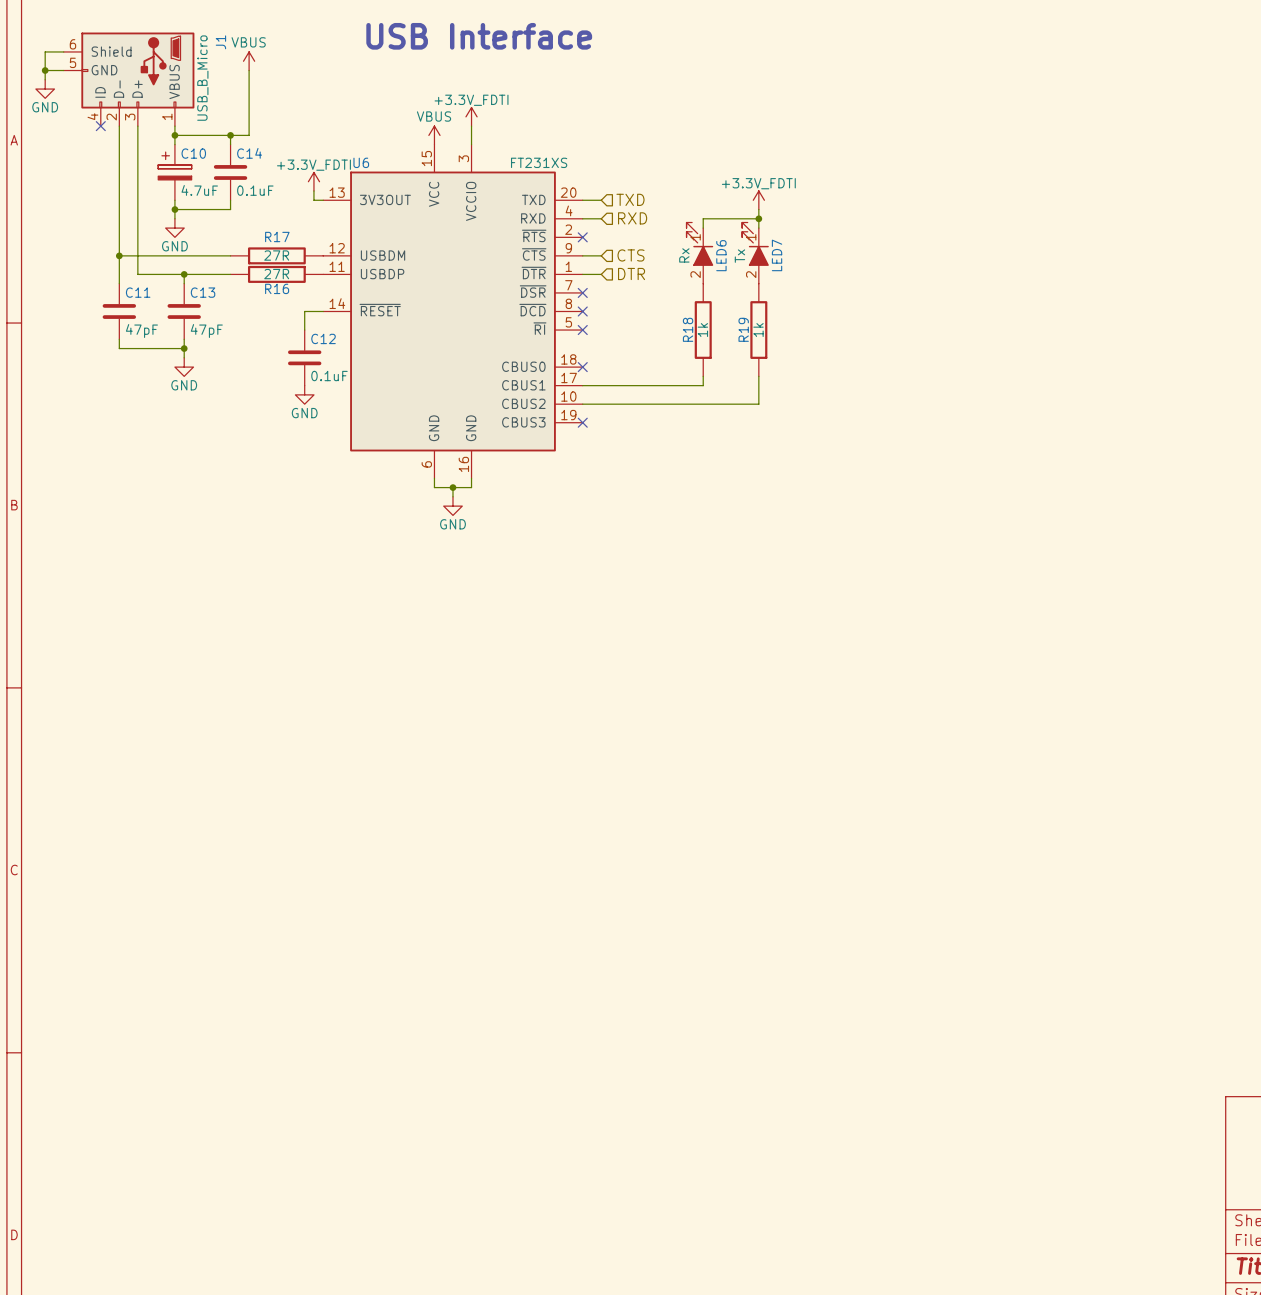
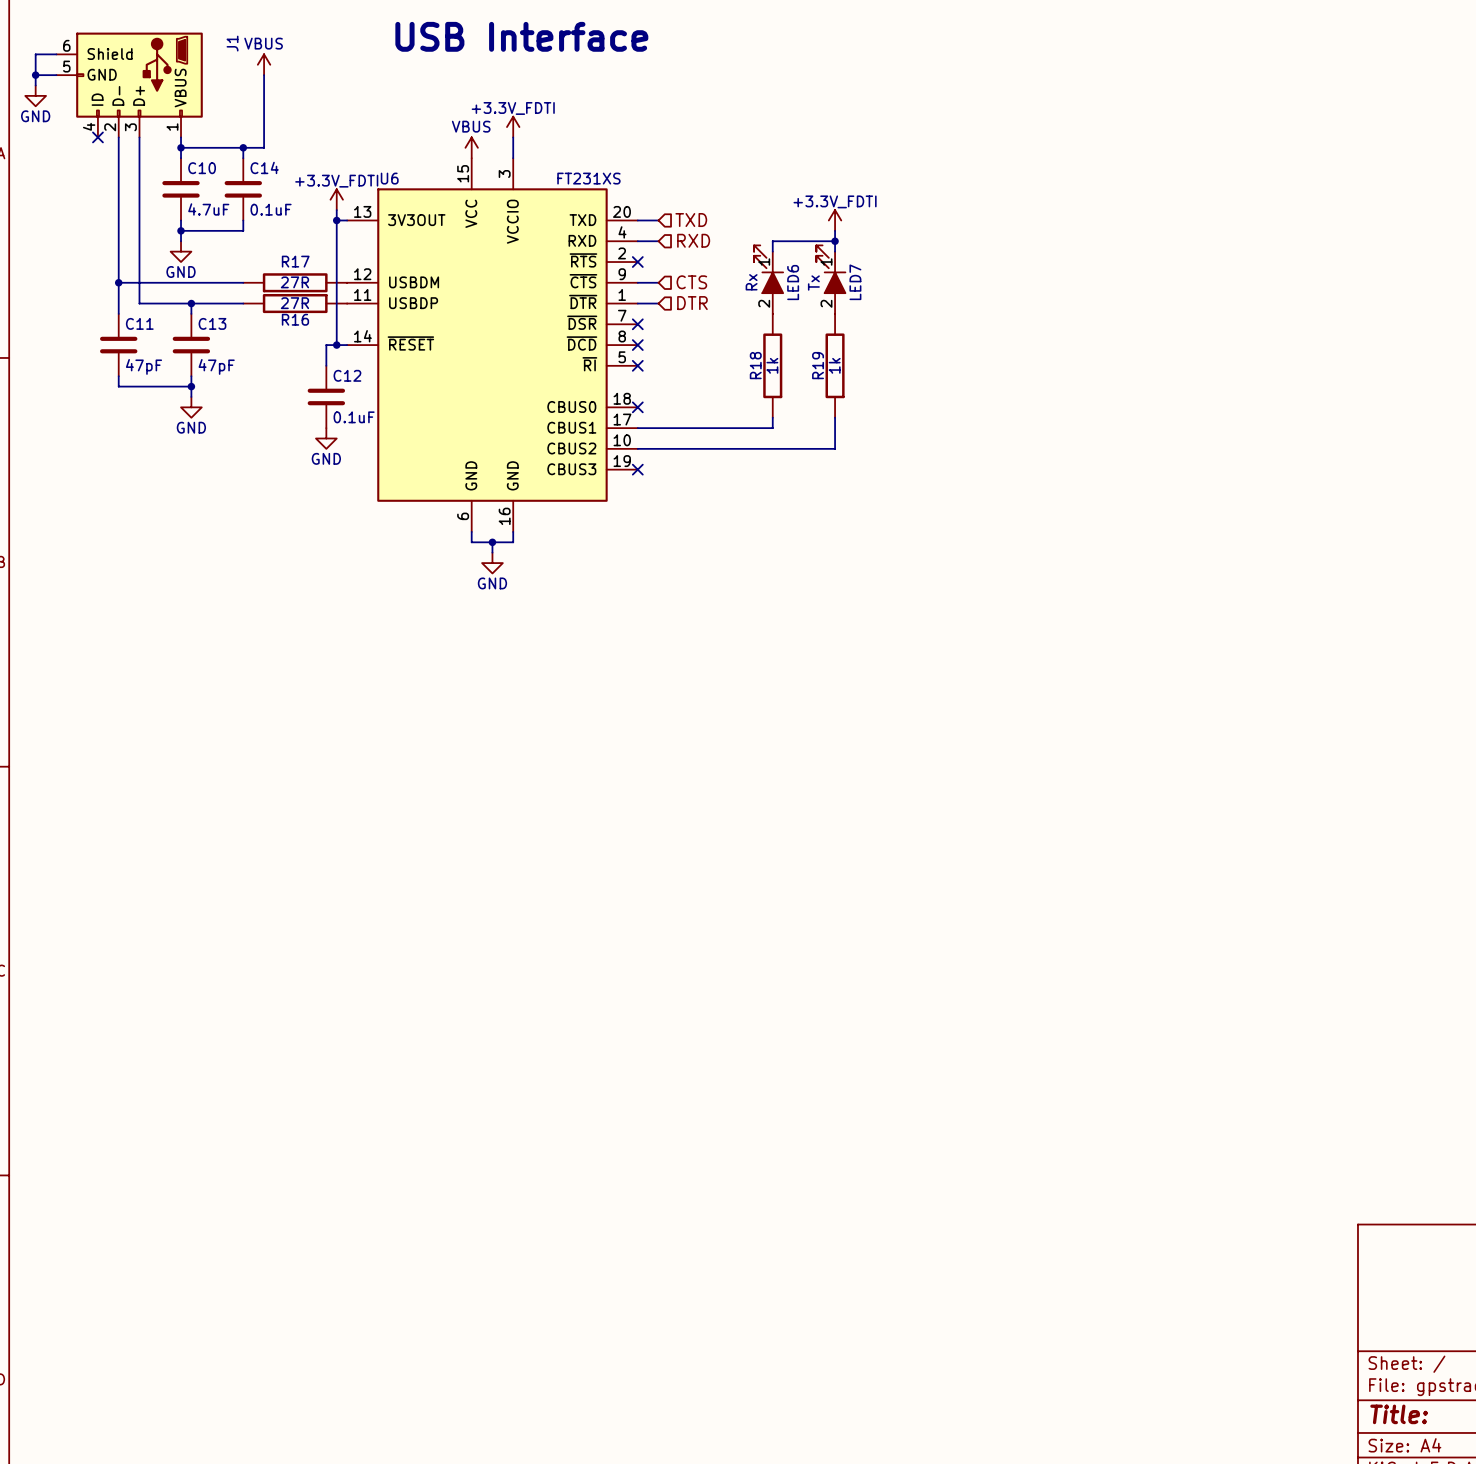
J1 value: USB_B_Micro (202, 78) -> none
C10 symbol: [158, 144, 192, 201] -> [162, 158, 200, 221]
wire: none -> (336, 220) (336, 345)
junction: none -> (336, 220)
junction: none -> (336, 345)

